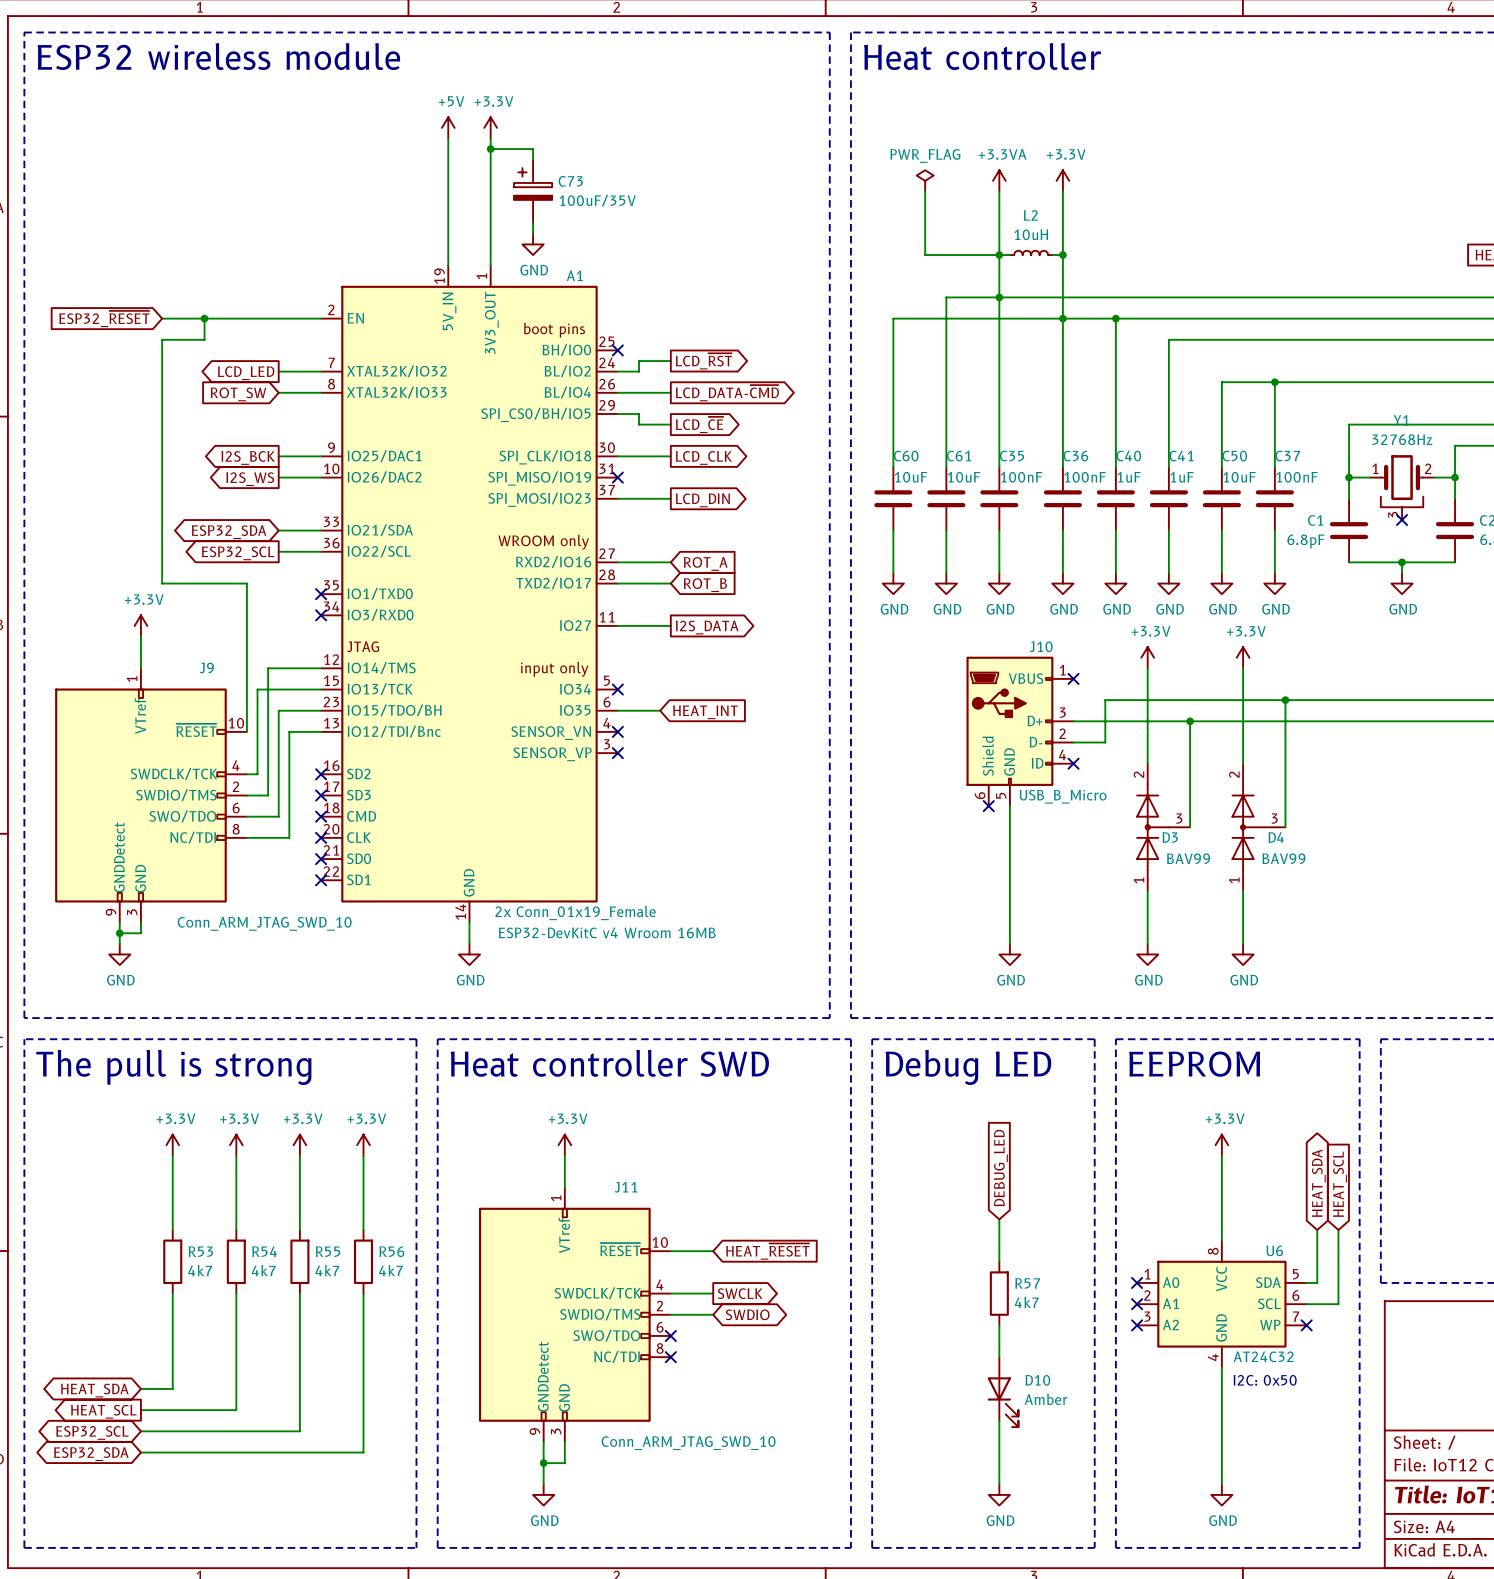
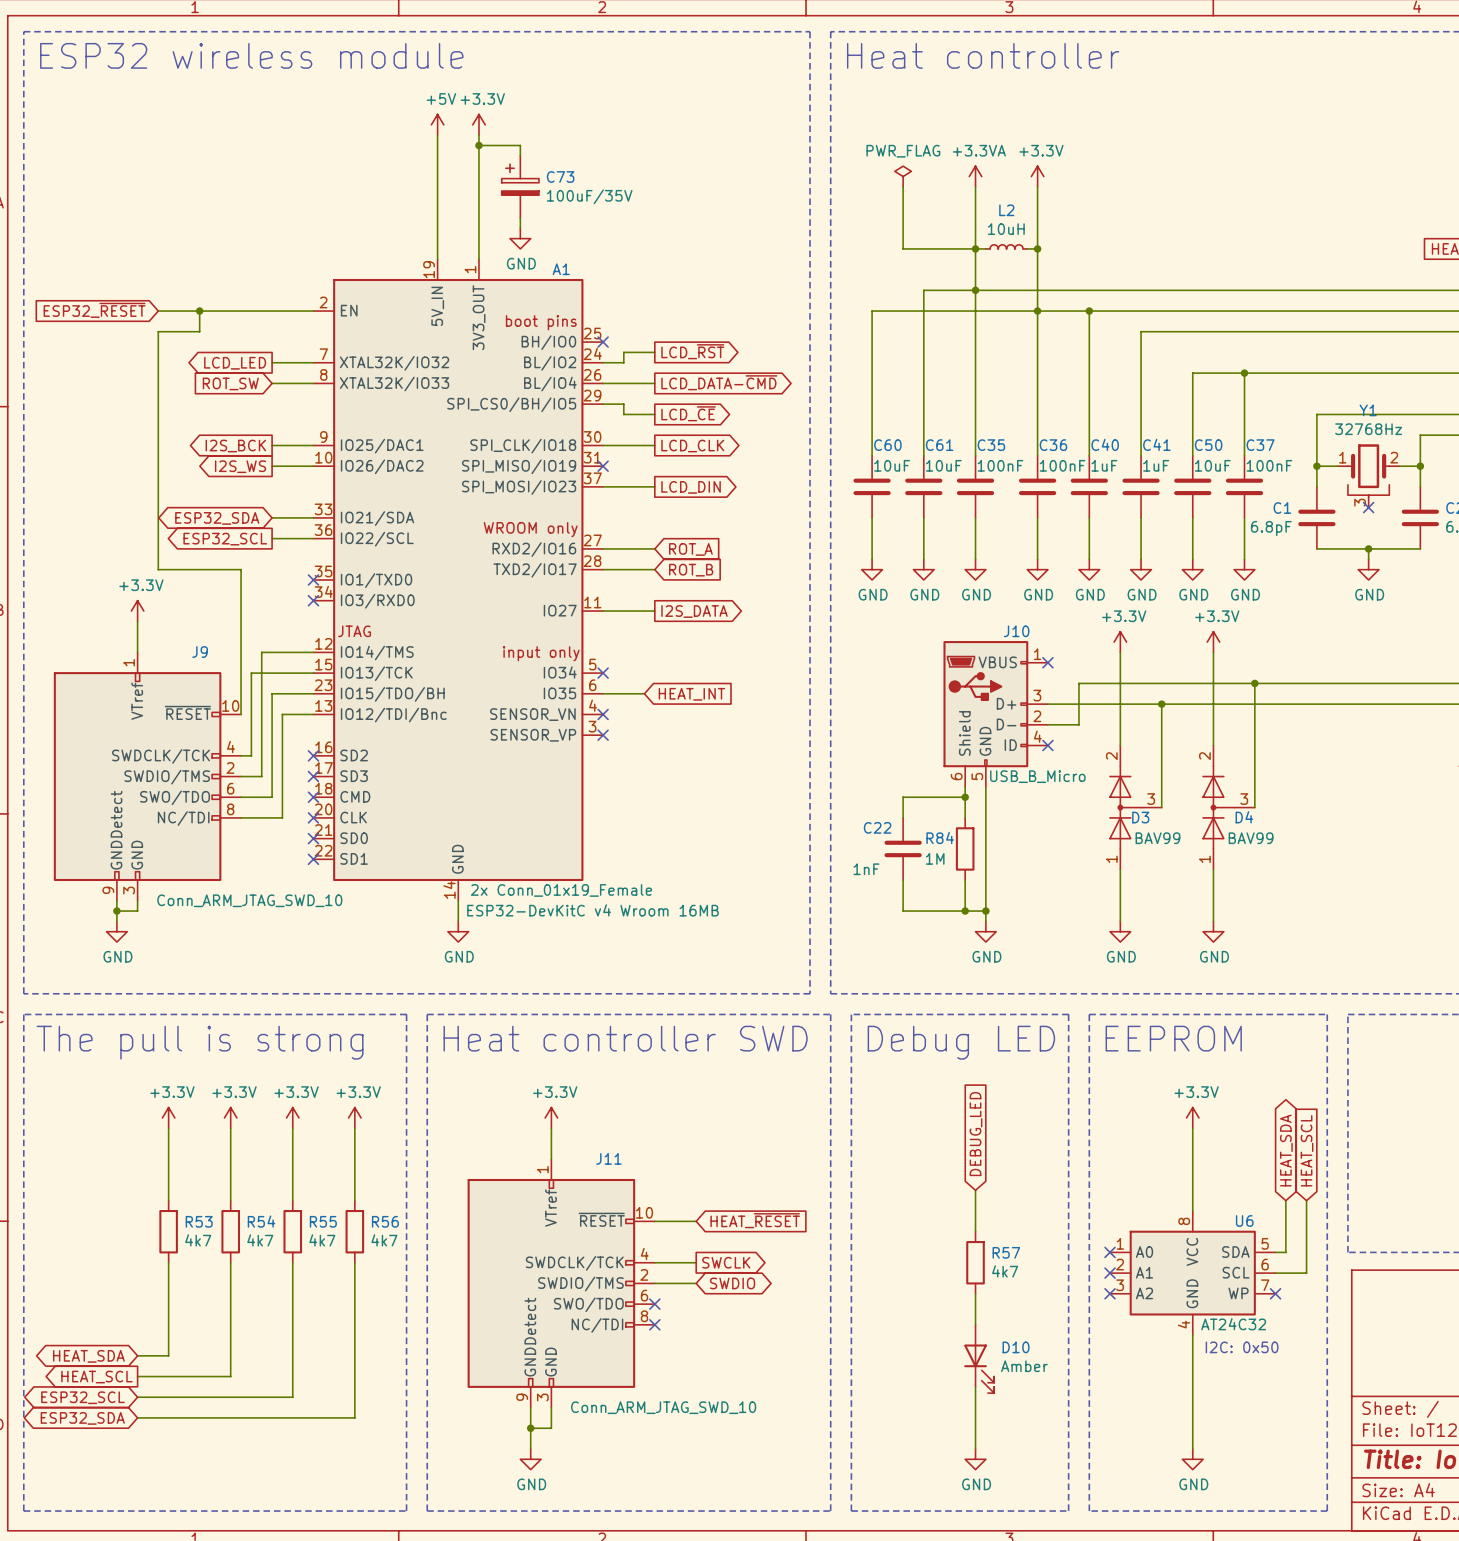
wire: none -> (965, 786) (965, 817)
no-connect mark: (988, 806) -> none
wire: none -> (965, 797) (903, 797) (903, 817)
junction: none -> (965, 797)
C22: none -> 1nF (903, 848)
R84: none -> 1M (965, 848)
wire: none -> (903, 879) (903, 911) (985, 911)
wire: none -> (965, 879) (965, 911)
junction: none -> (965, 911)
junction: none -> (985, 911)

